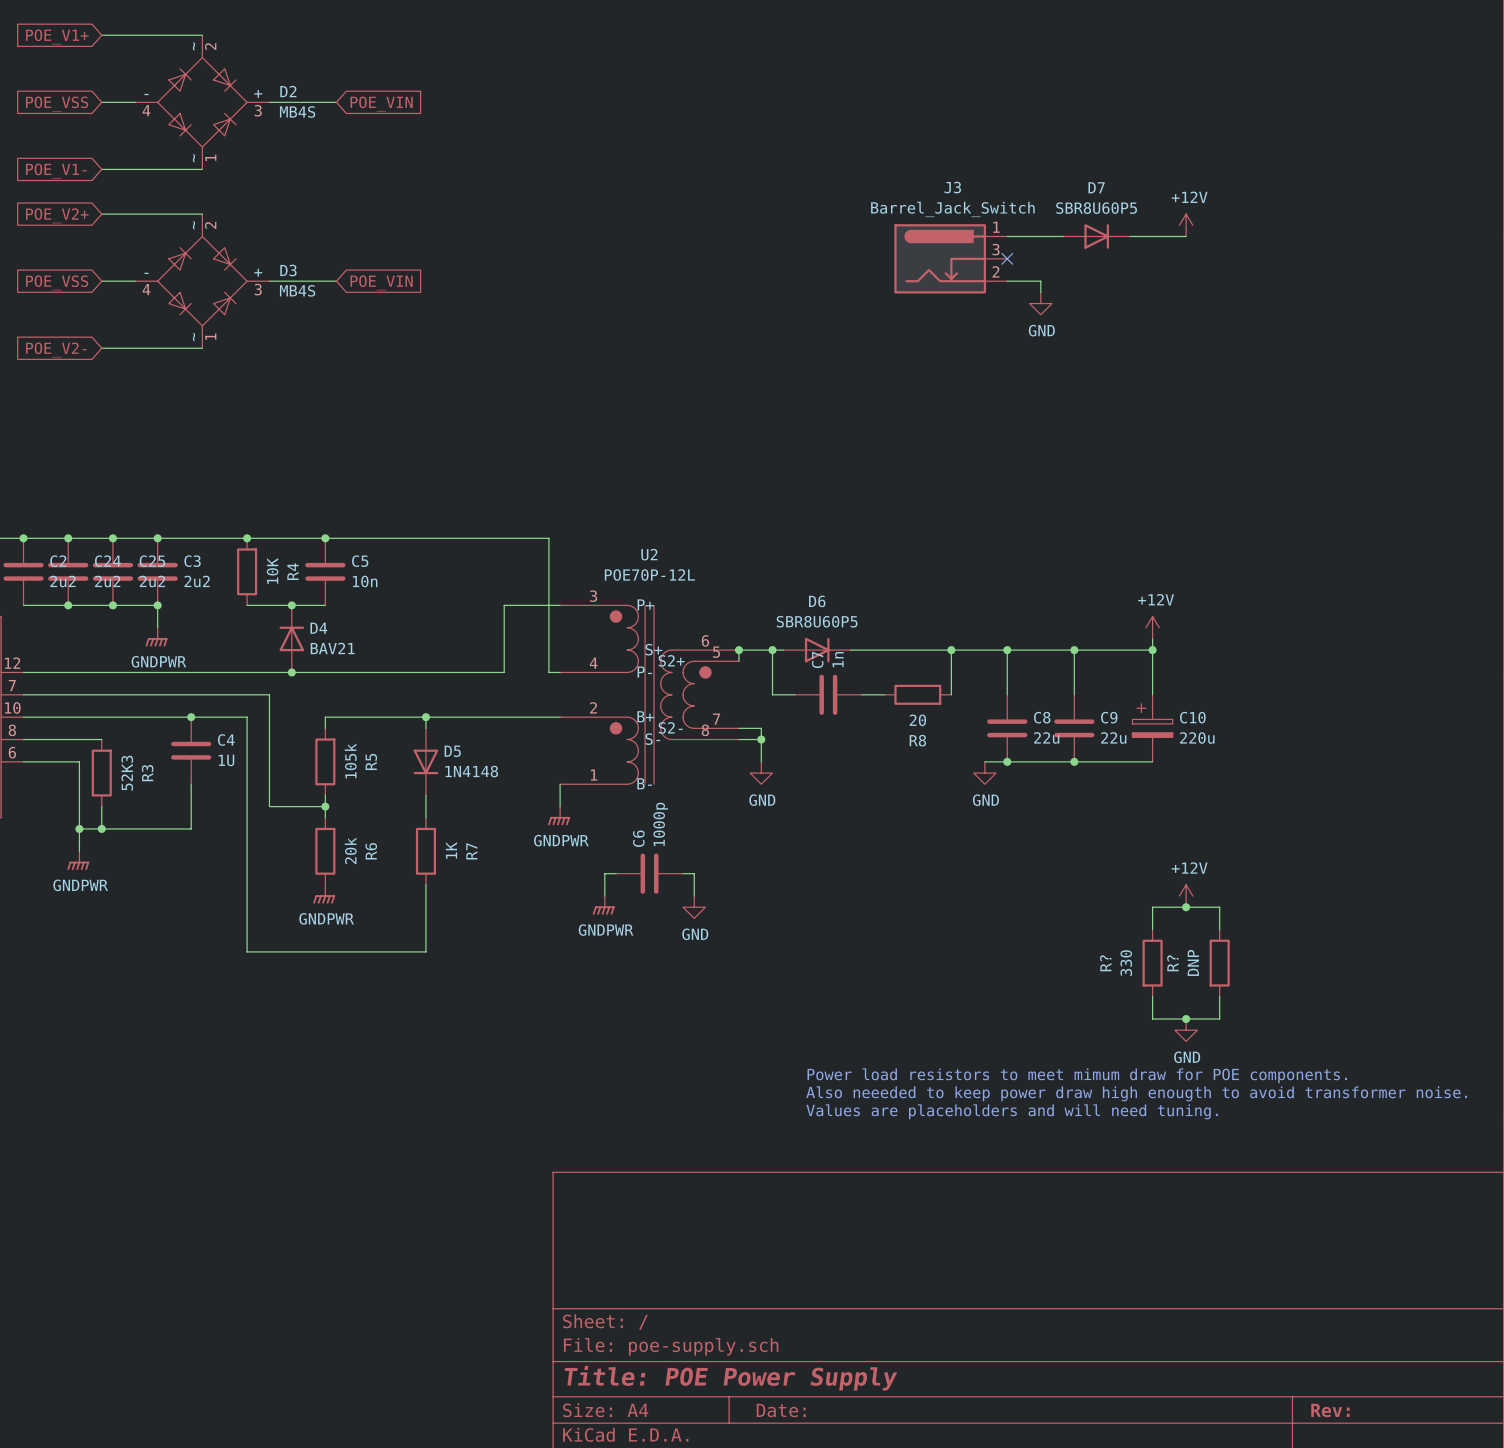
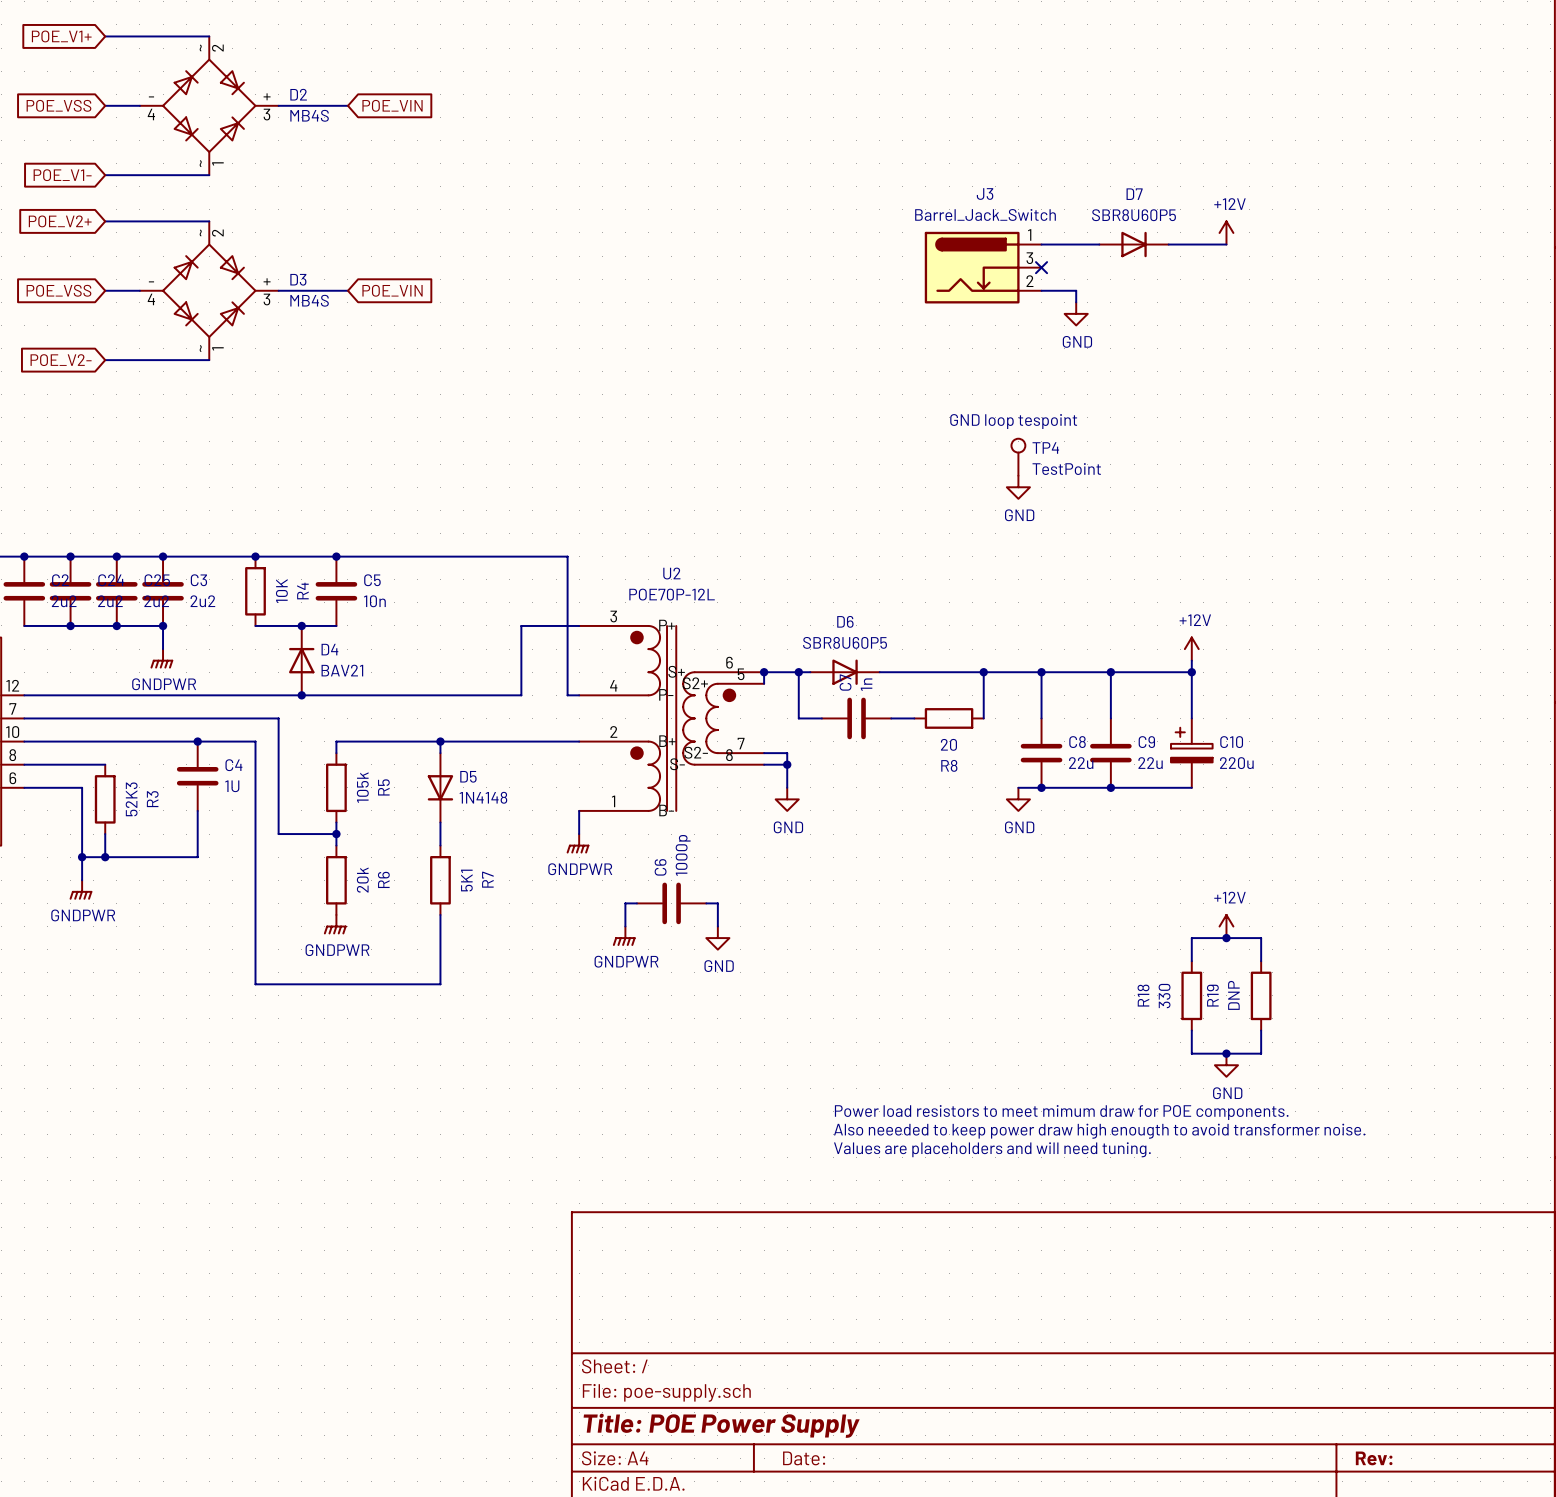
text: none -> GND loop tespoint (1013, 421)
TP4: none -> TestPoint (1018, 457)
power symbol: none -> GND (1018, 487)
R7 value: 1K (451, 850) -> 5K1 (466, 880)
R? name: R? (1105, 963) -> R18 (1143, 995)
R? name: R? (1172, 963) -> R19 (1212, 995)

